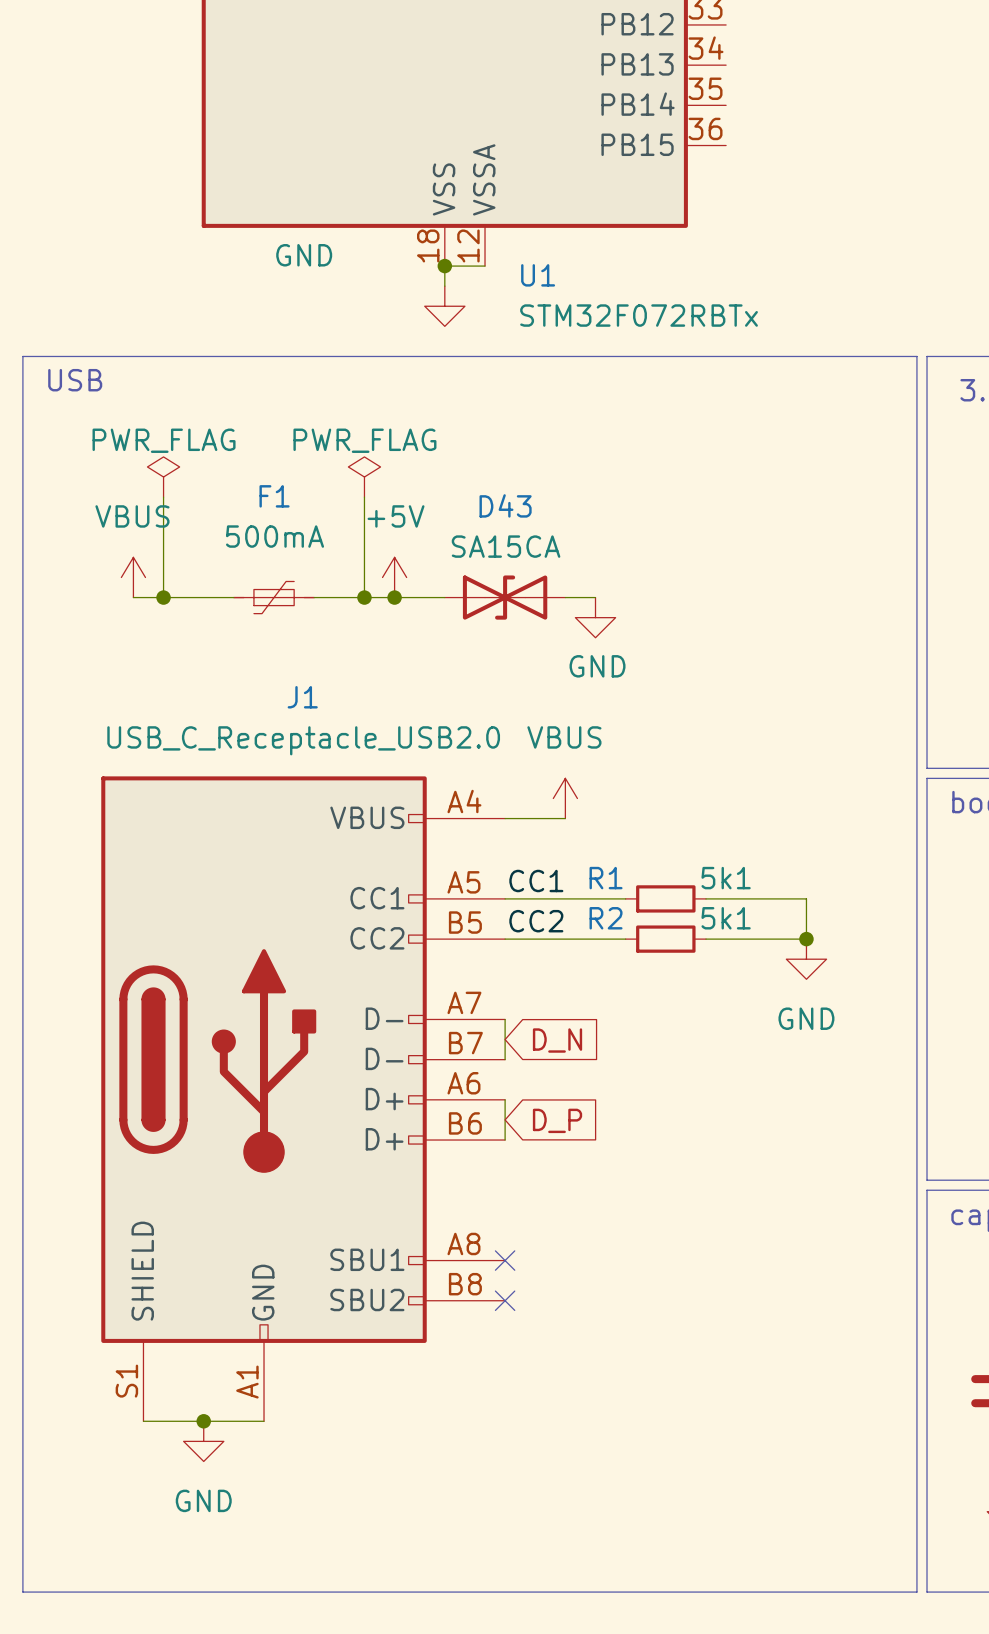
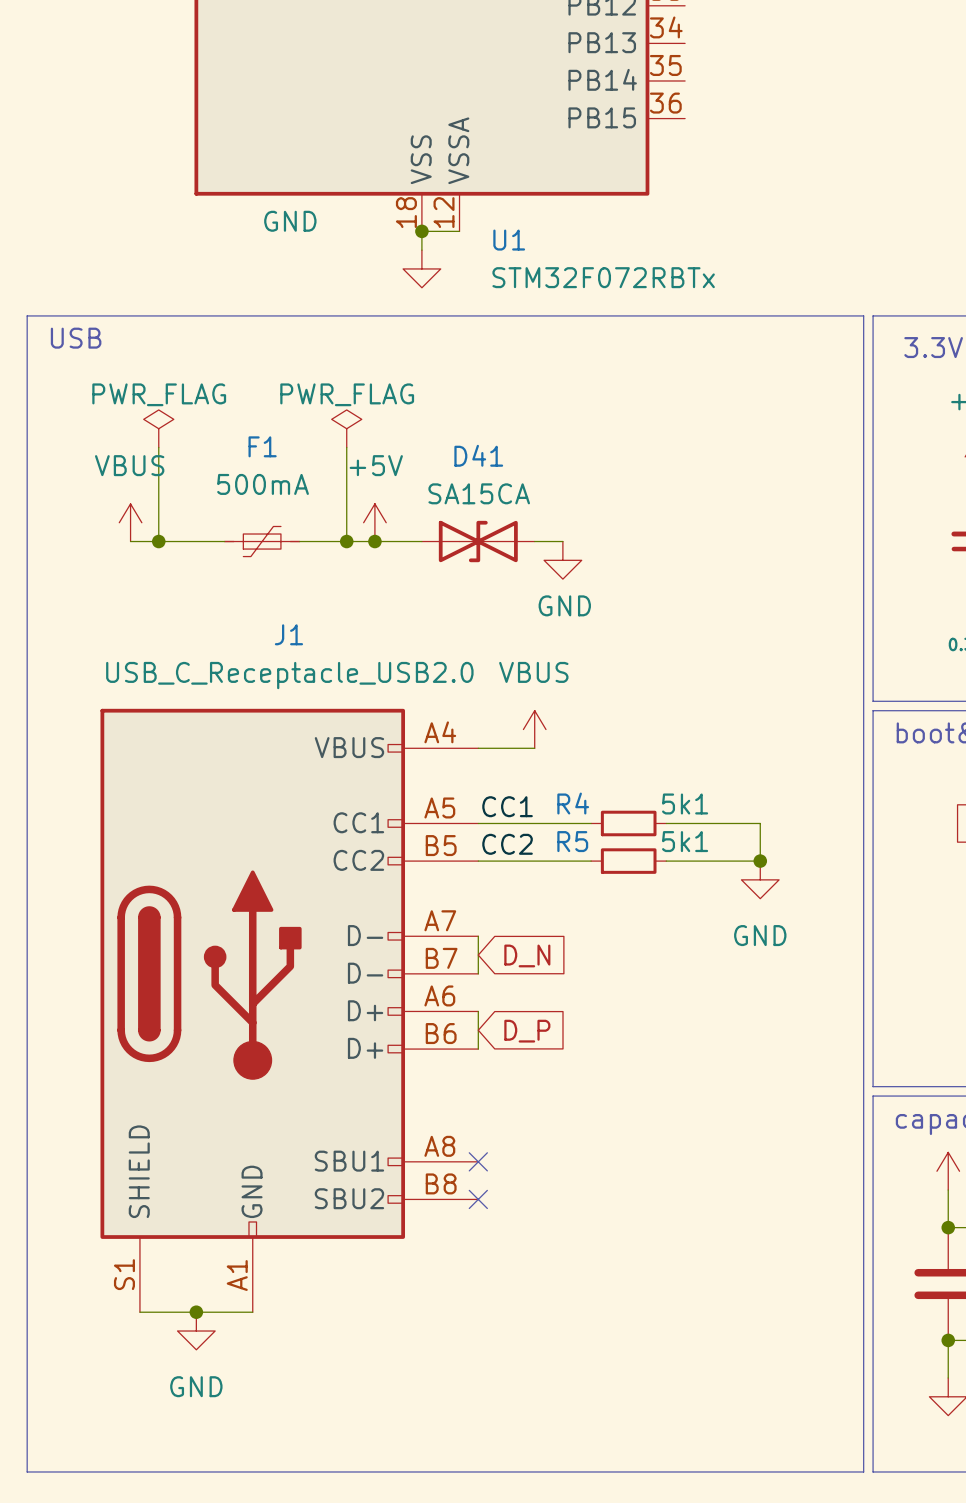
D43 name: D43 (505, 505) -> D41 (478, 455)
R1 name: R1 (606, 878) -> R4 (573, 803)
R2 name: R2 (606, 918) -> R5 (572, 841)

